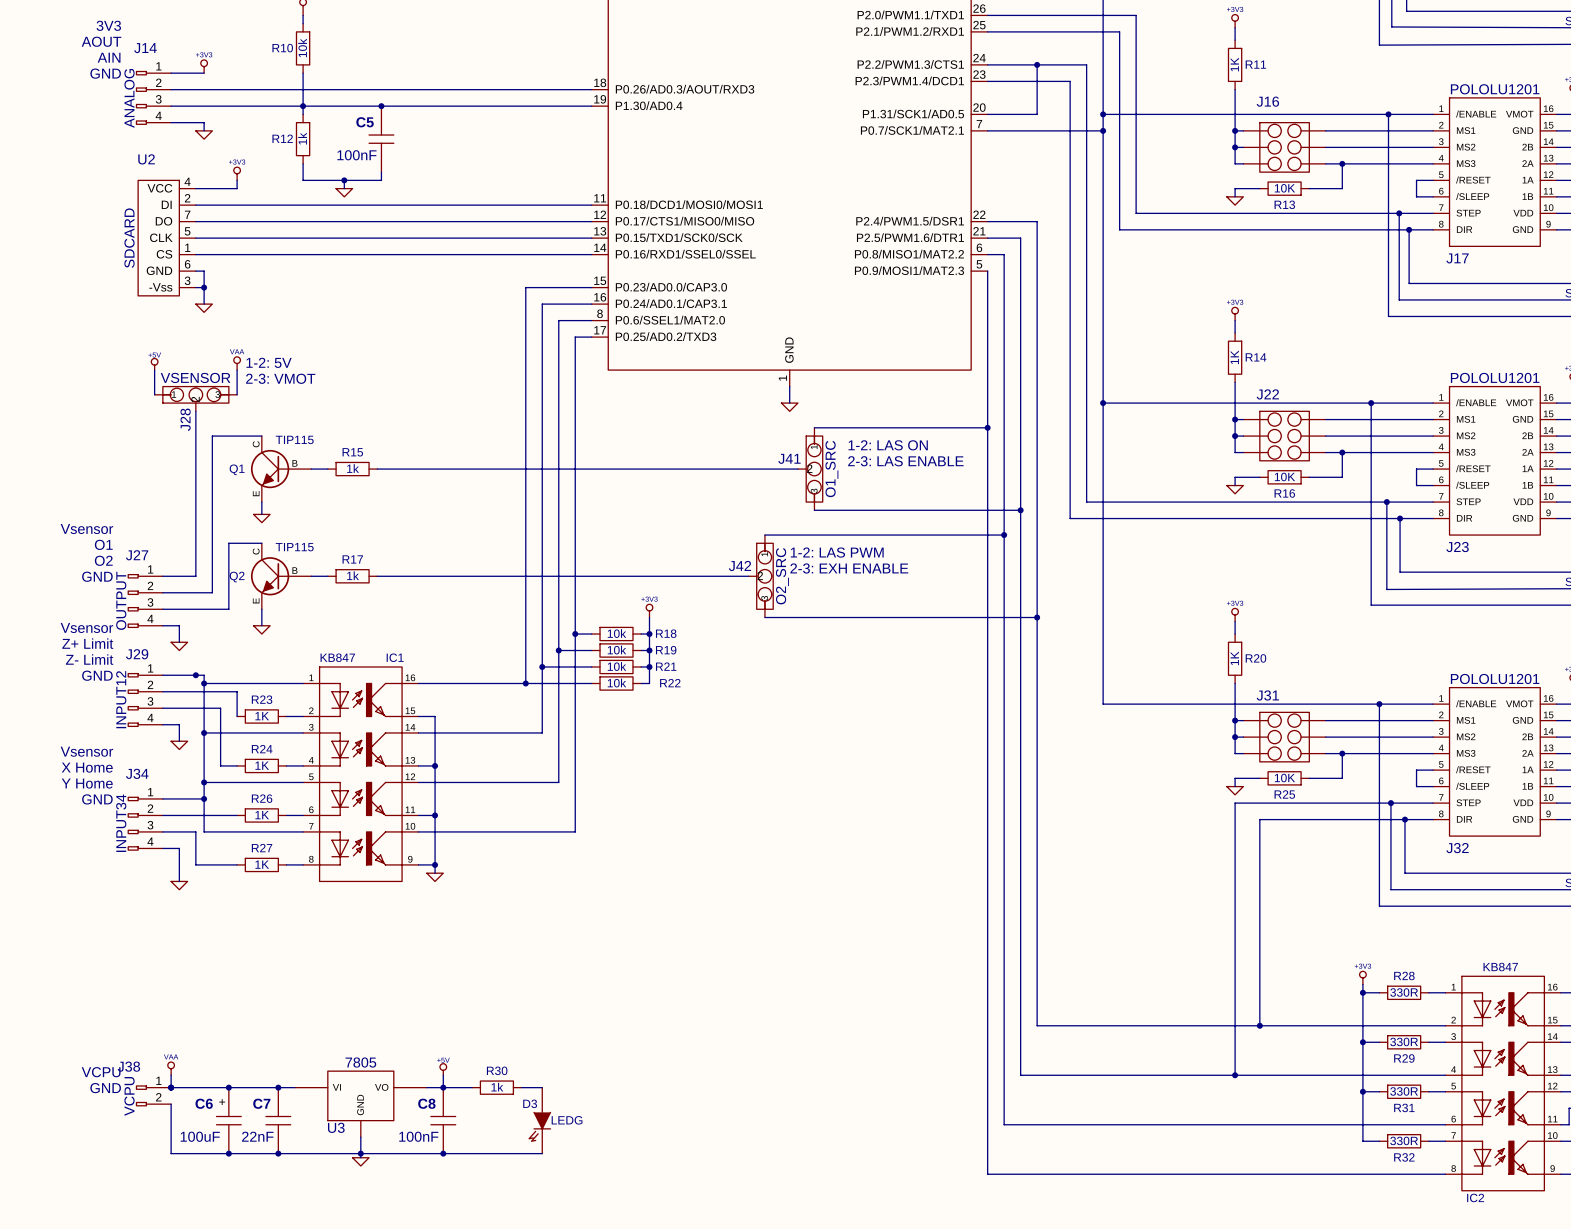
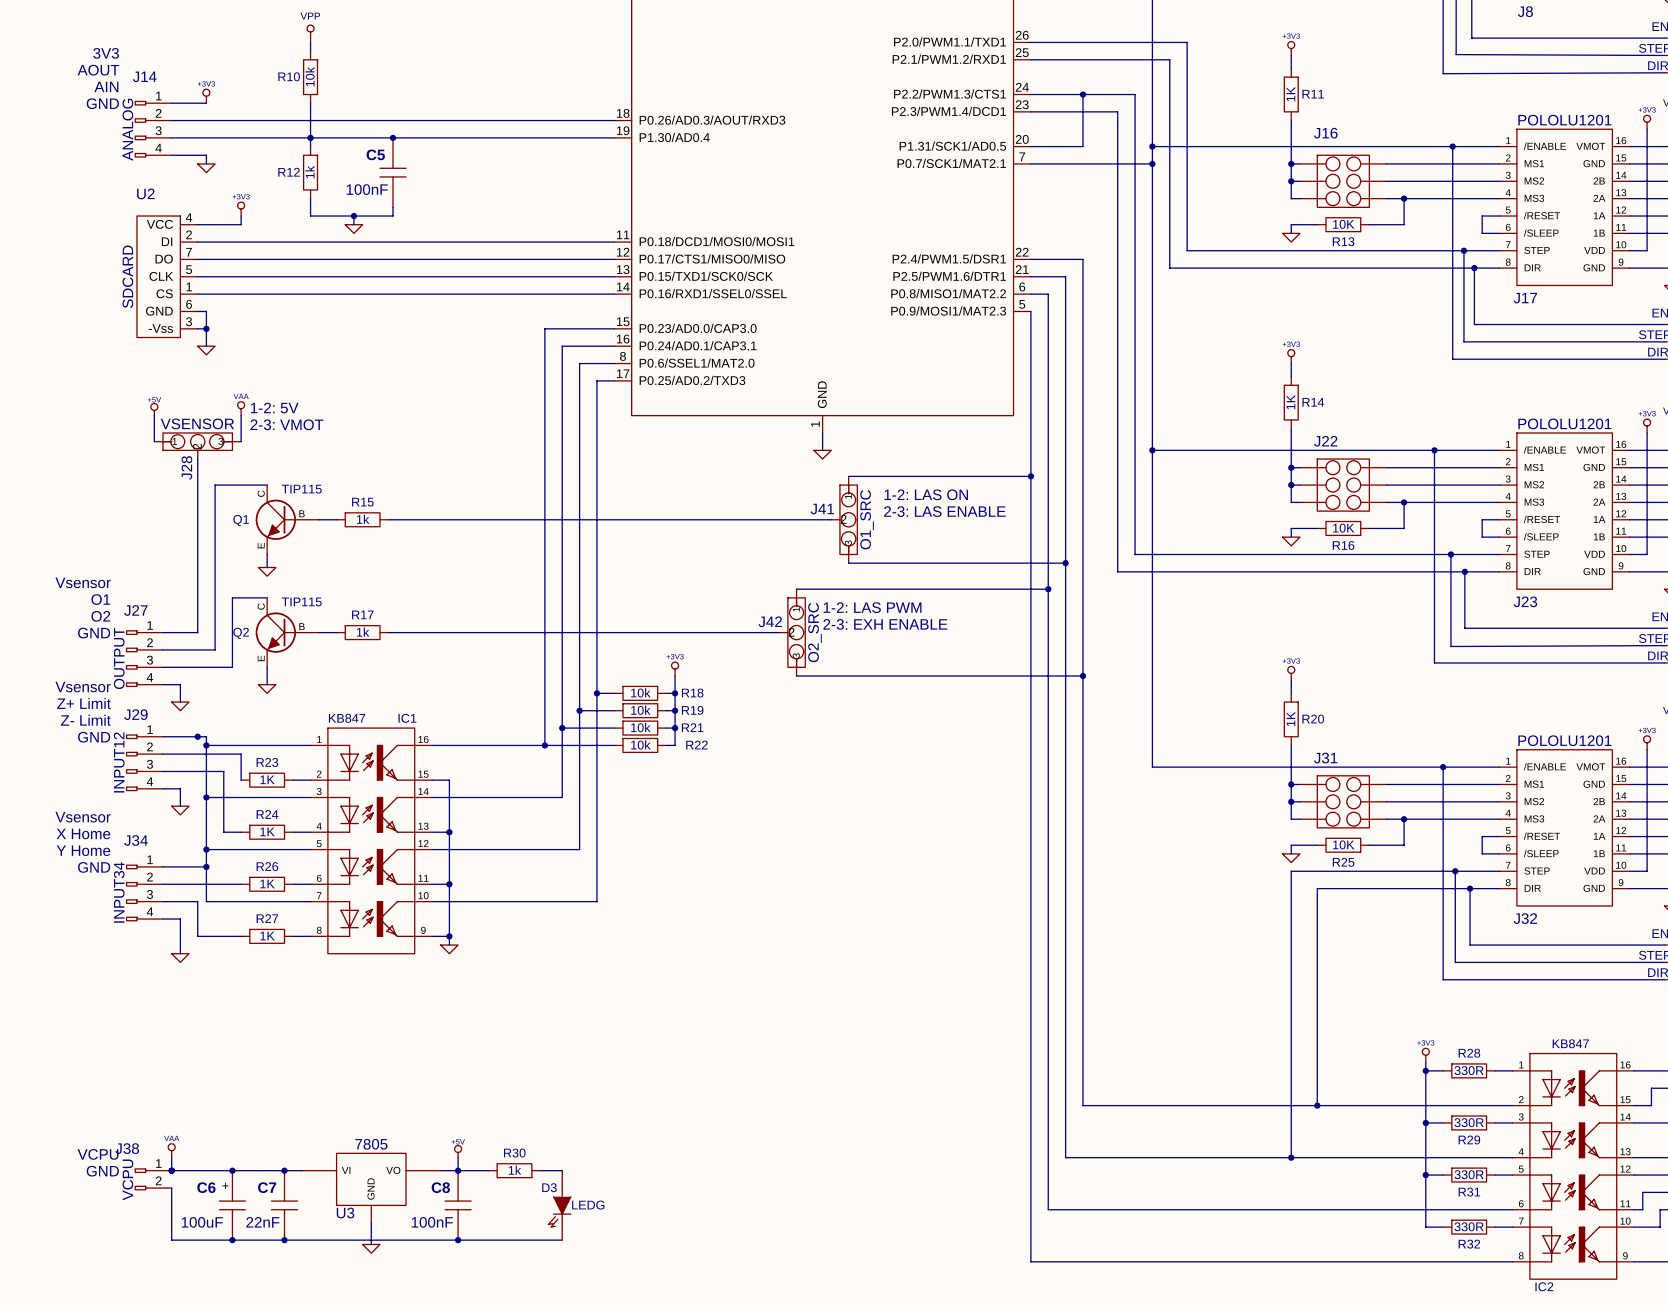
junction: (360, 1153) -> none

